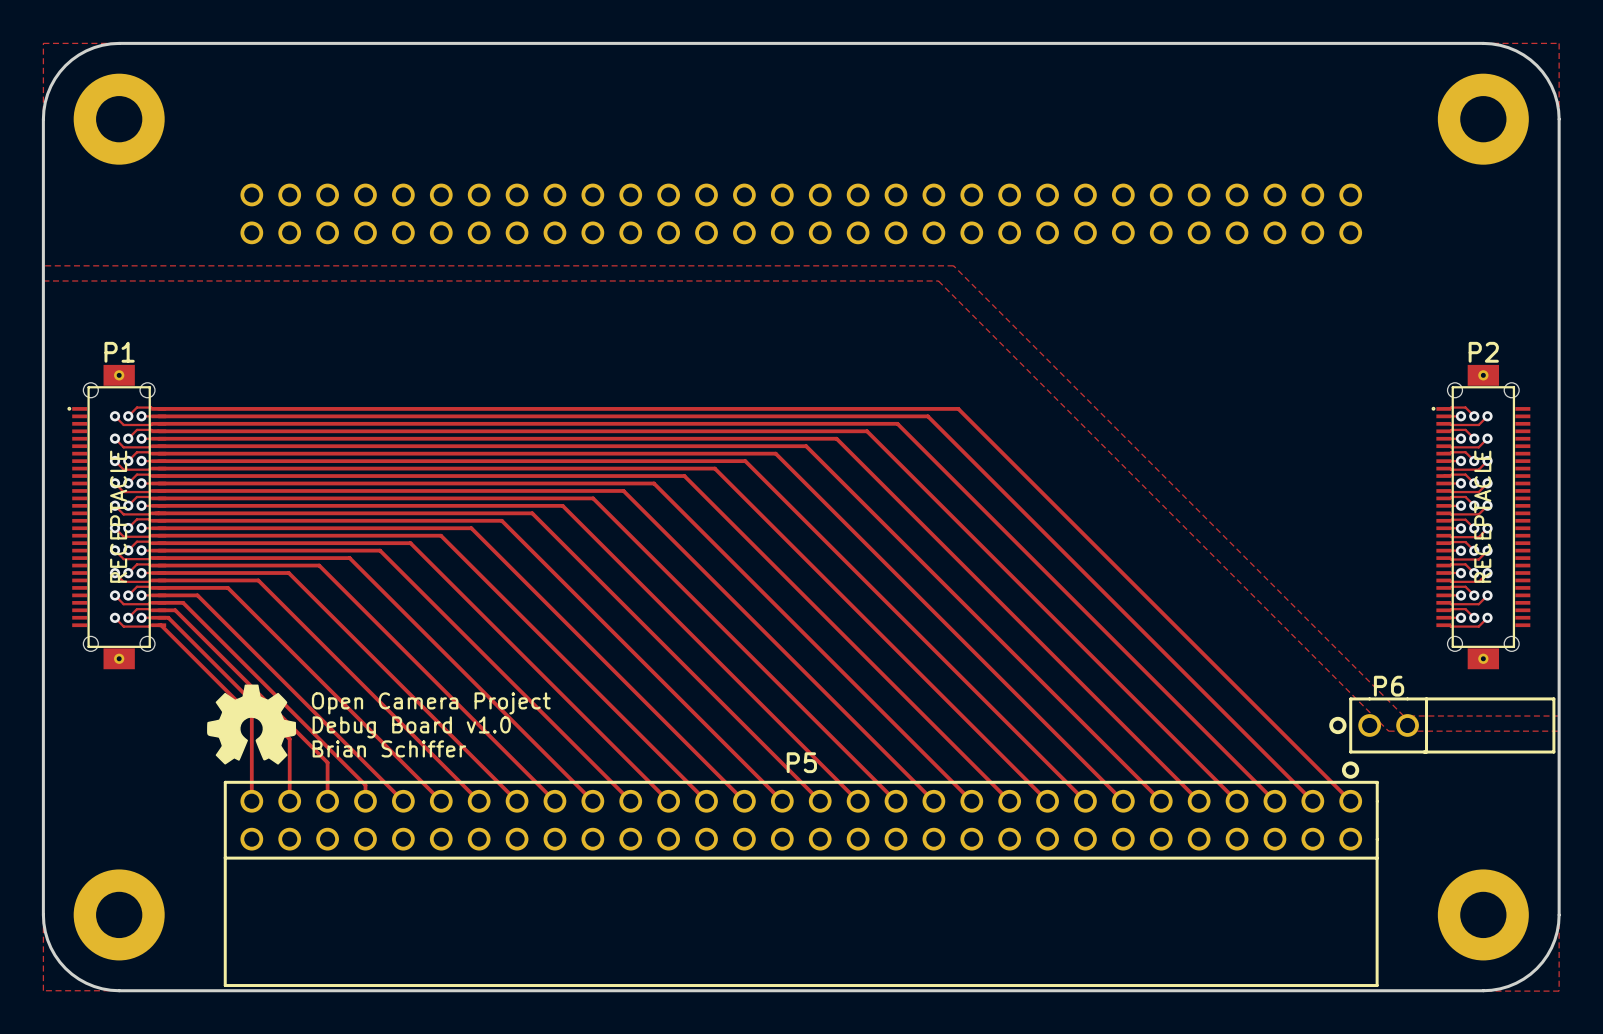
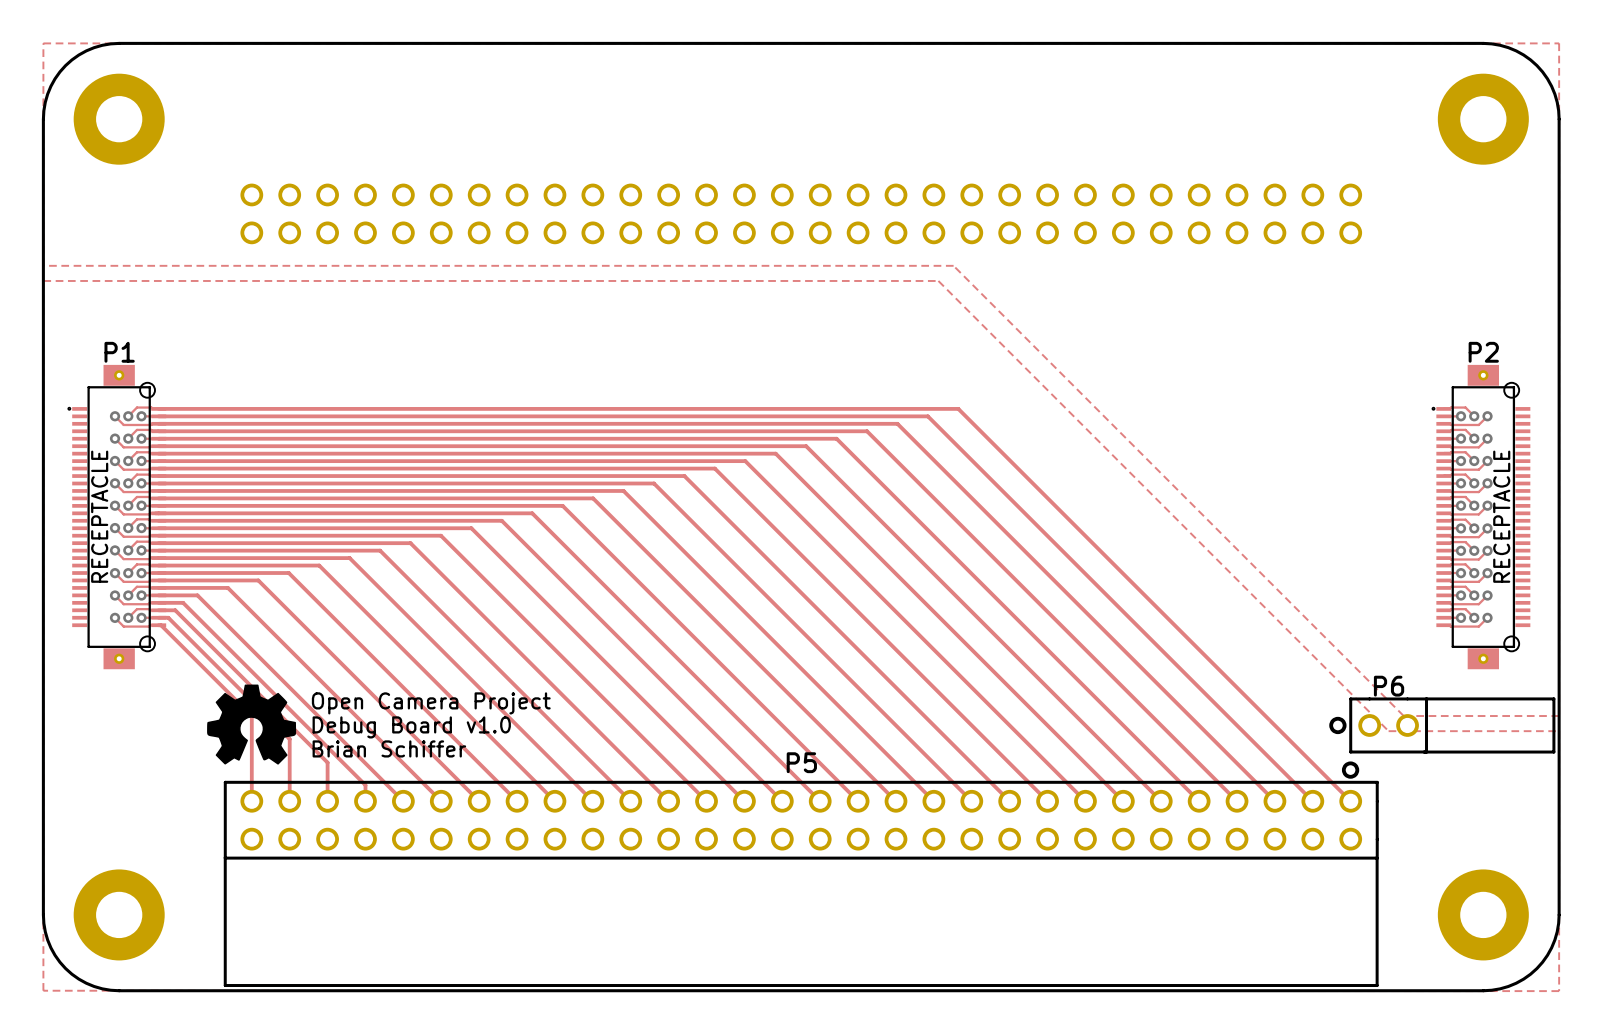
P1 footprint: [67, 364, 167, 670] -> [67, 364, 167, 670]
P2 footprint: [1431, 364, 1531, 670] -> [1431, 364, 1531, 670]

